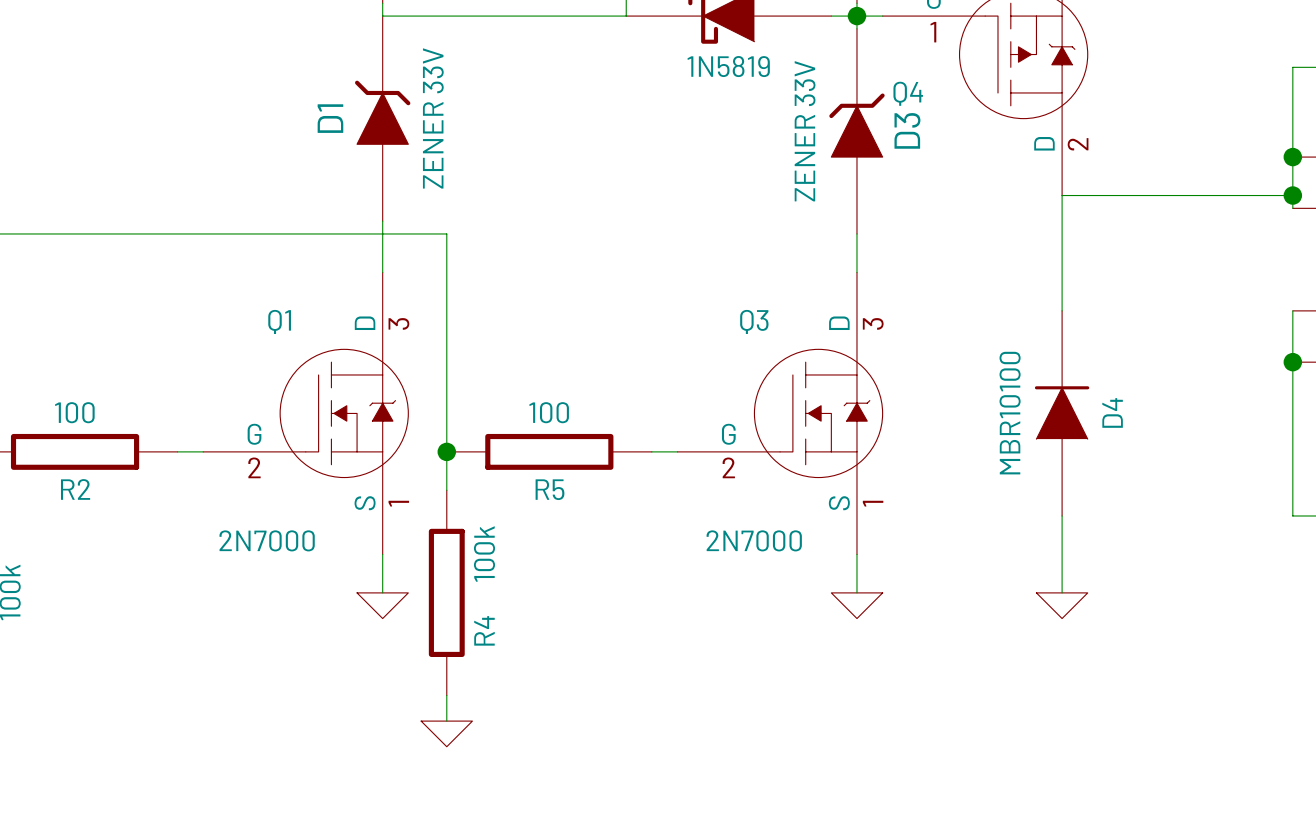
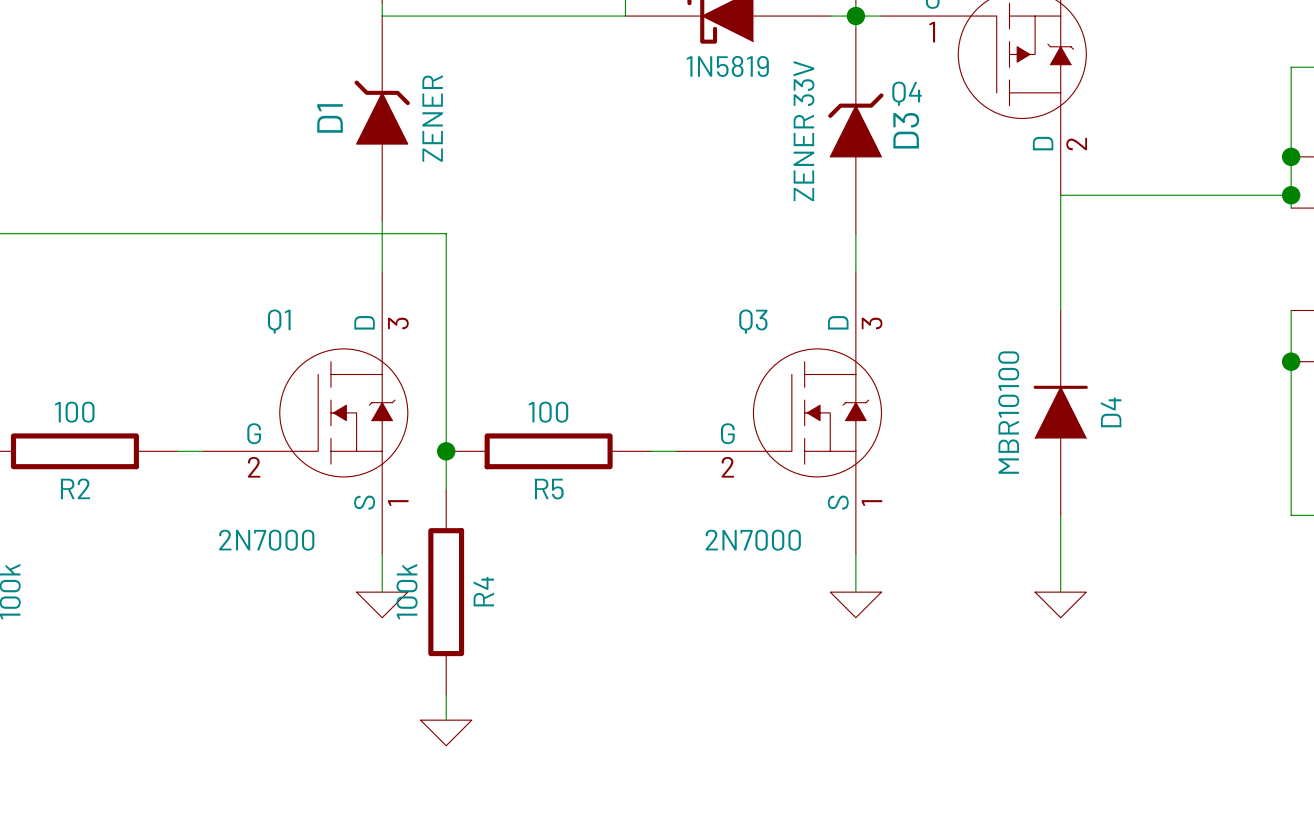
D1 value: ZENER 33V (433, 118) -> ZENER (432, 118)
R4 value position: 100k (484, 554) -> 100k (407, 591)
R4 name position: R4 (484, 630) -> R4 (483, 591)

